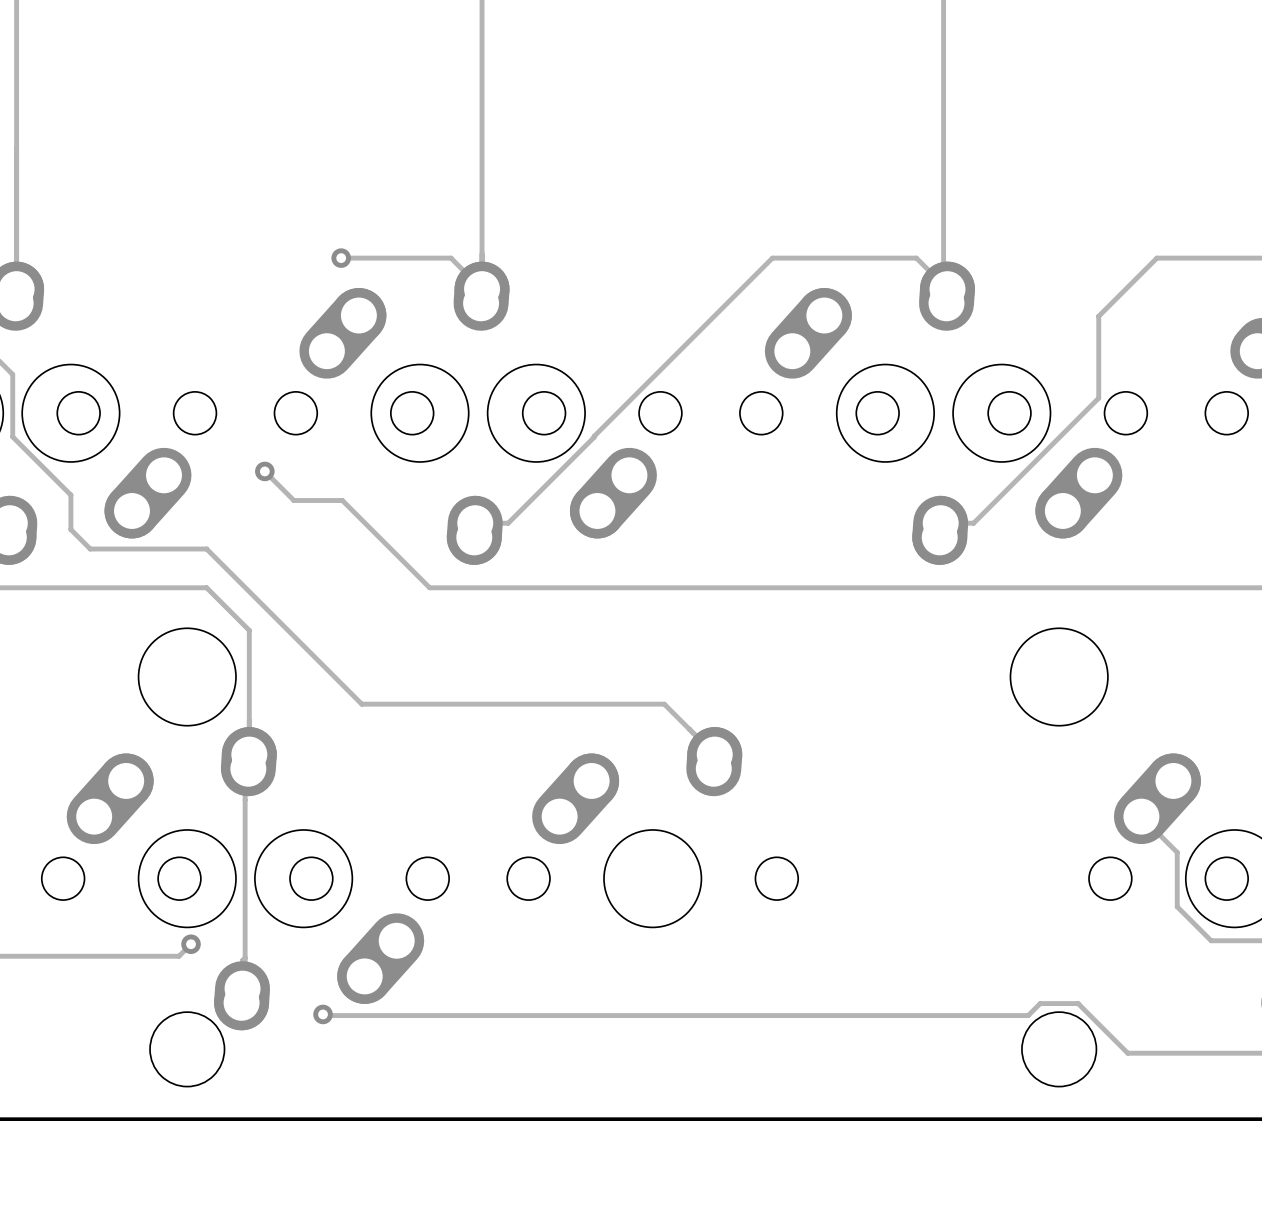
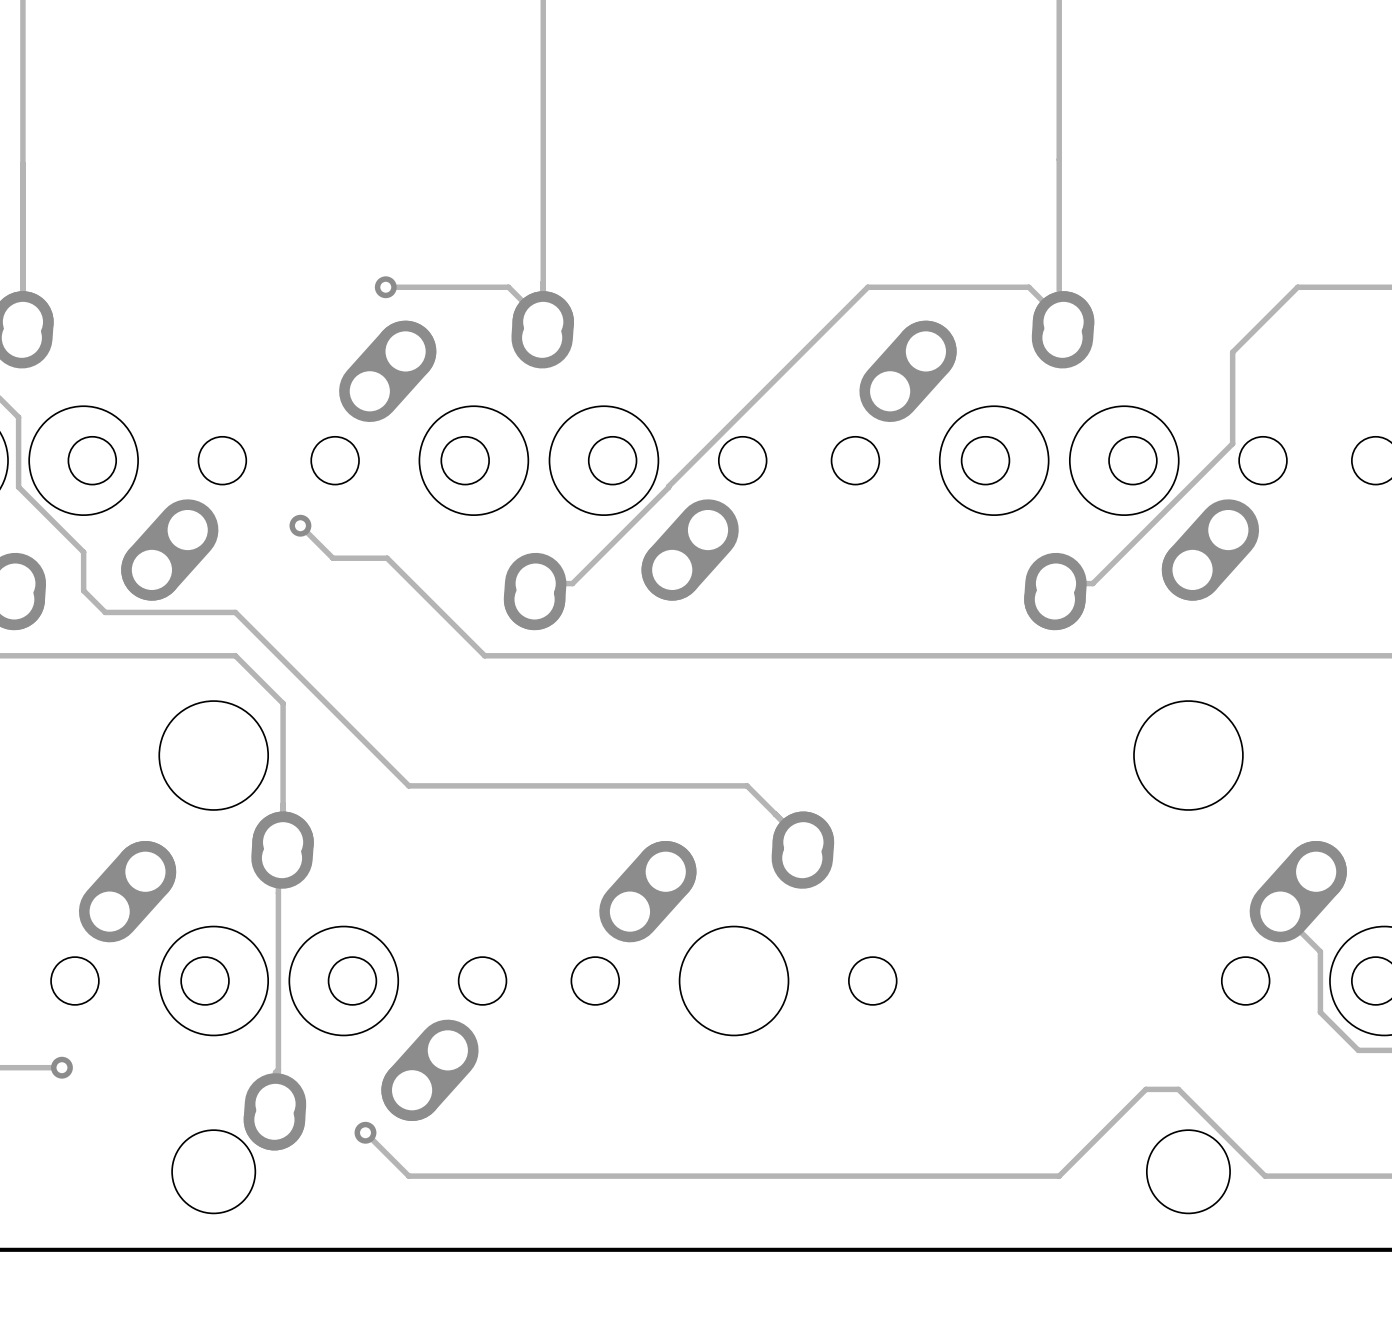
track: (191, 944) (179, 956) (51, 956) -> none
via position: (191, 944) -> (61, 1067)
track: (1078, 1003) (1040, 1003) (1028, 1015) (324, 1015) -> (1209, 1120) (1178, 1089) (1145, 1089) (1059, 1176) (408, 1176) (366, 1134)

